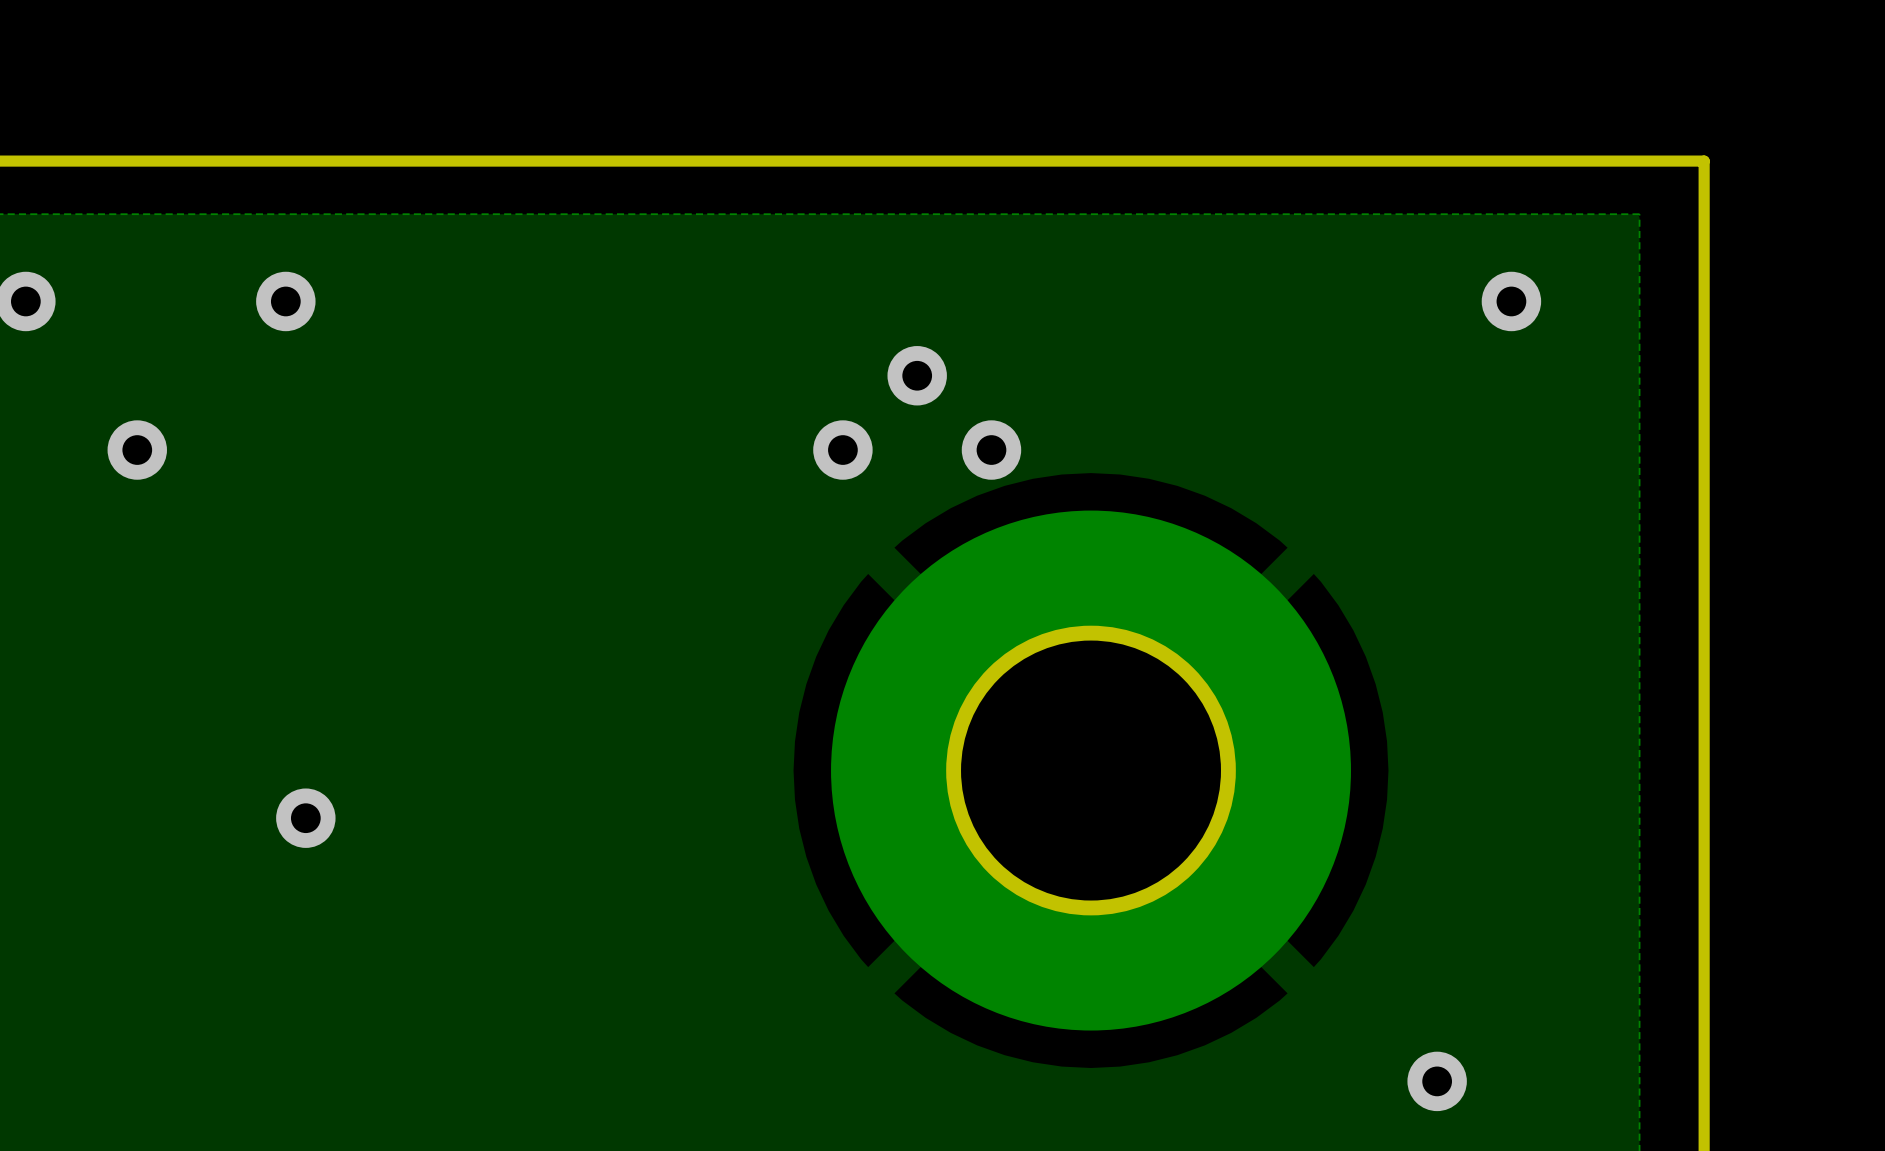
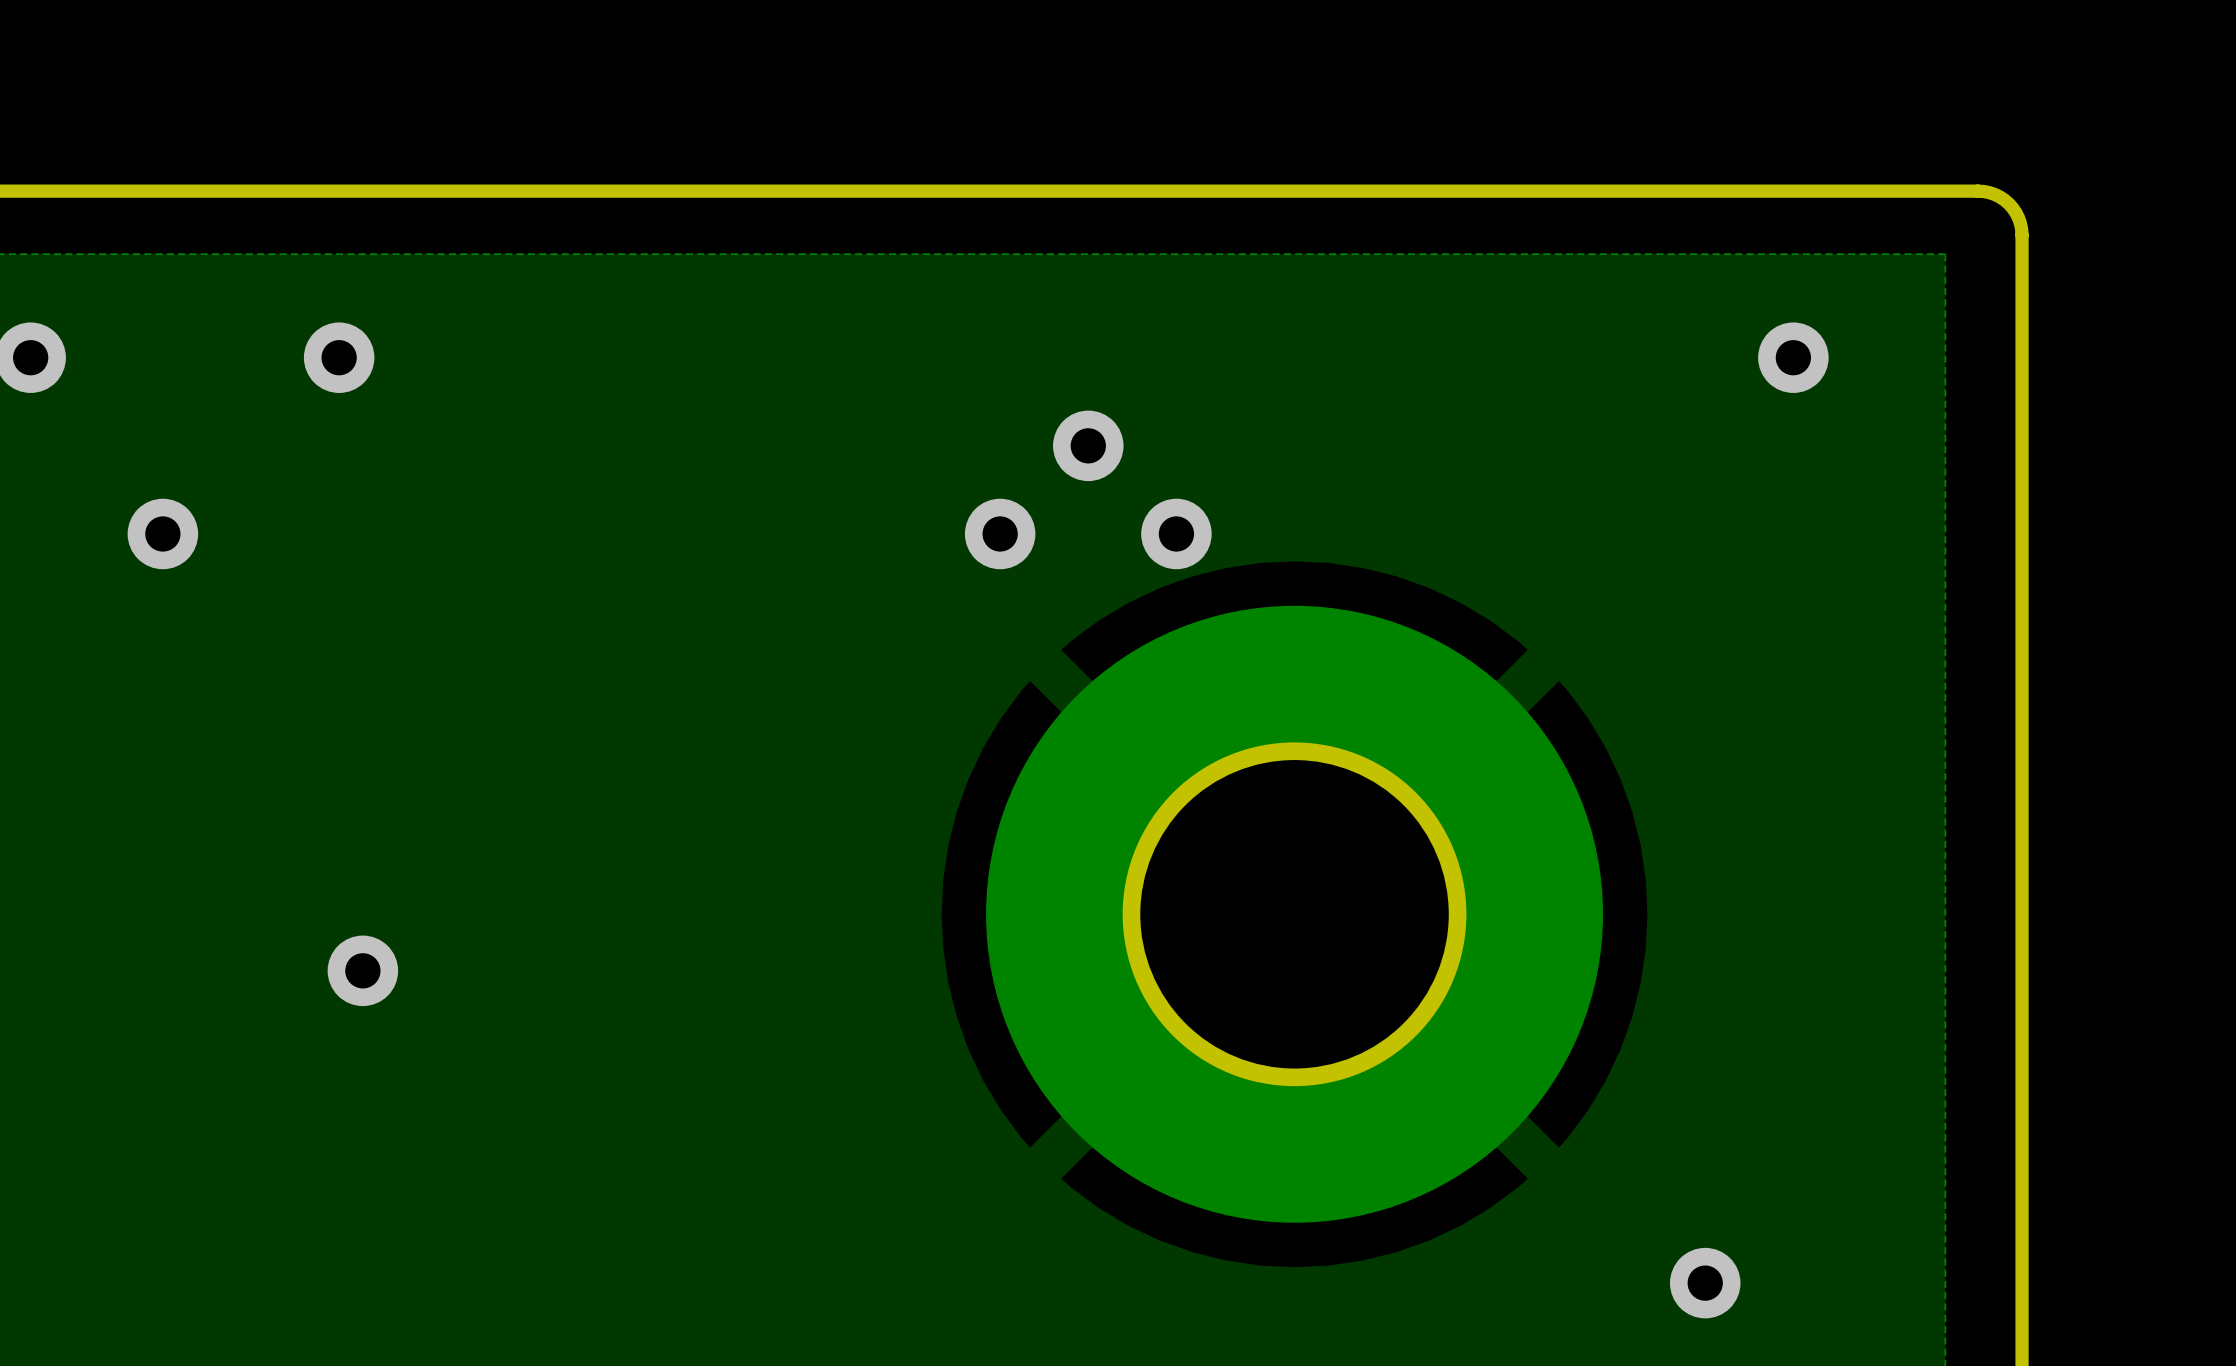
board edge: (1667, 161) (1704, 161) (1704, 198) -> (1977, 191) (1994, 194) (2009, 204) (2018, 218) (2022, 235)

